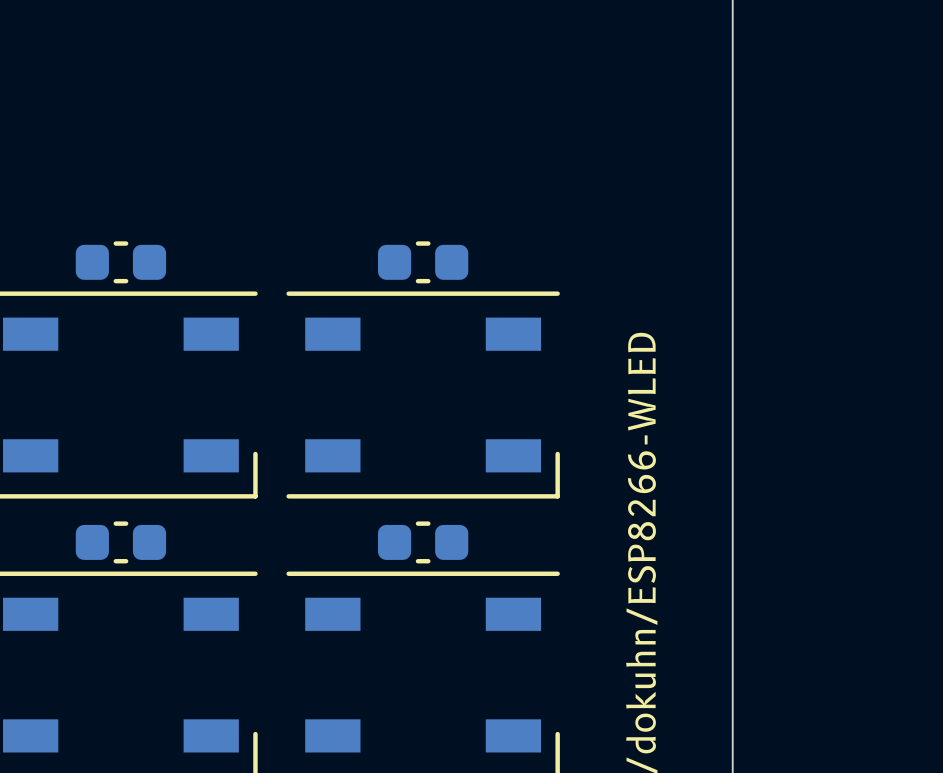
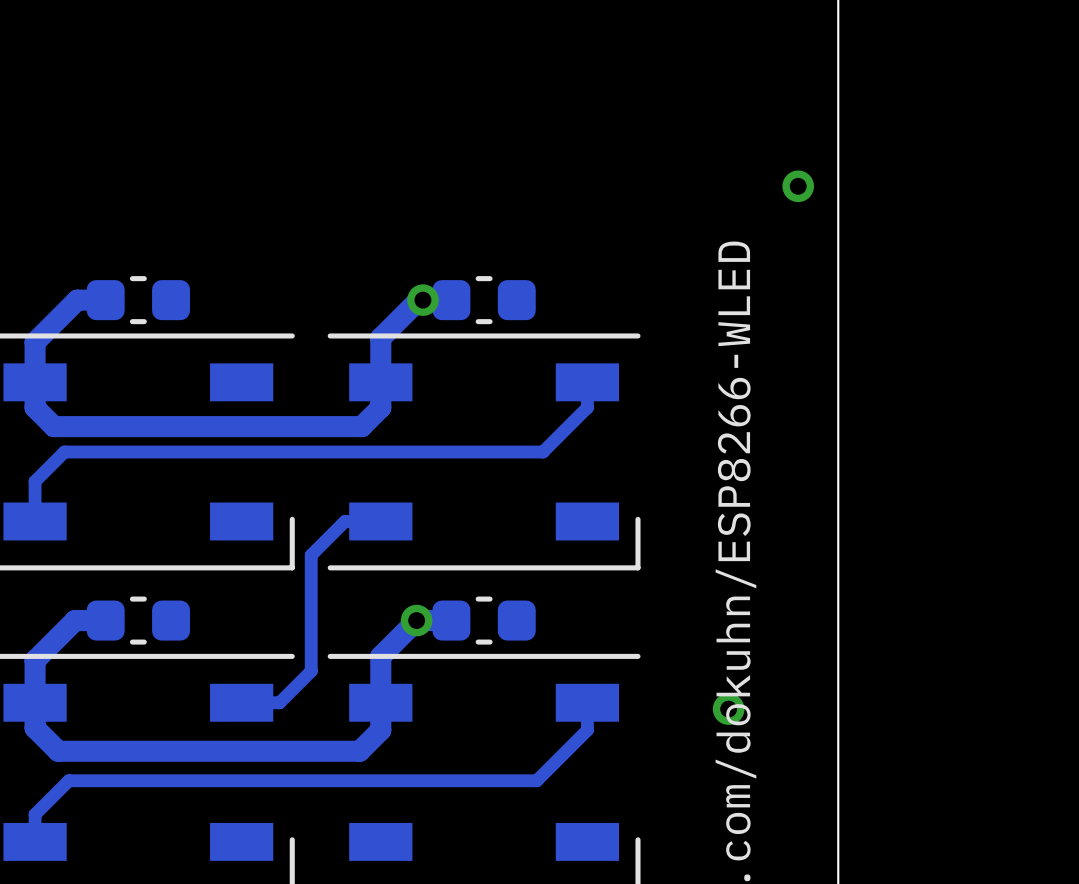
via: none -> (798, 186)
via: none -> (422, 300)
track: none -> (451, 300) (418, 300) (380, 338) (380, 407) (361, 426) (54, 426) (35, 407) (35, 342) (77, 300) (105, 300)
track: none -> (587, 382) (587, 407) (543, 452) (64, 452) (35, 481) (35, 521)
track: none -> (380, 521) (344, 521) (311, 555) (311, 671) (279, 702) (241, 702)
via: none -> (416, 620)
track: none -> (451, 620) (416, 620) (380, 656) (380, 730) (359, 751) (58, 751) (35, 728) (35, 660) (75, 620) (105, 620)
track: none -> (587, 702) (587, 730) (536, 780) (68, 780) (35, 814) (35, 841)
via: none -> (728, 709)

